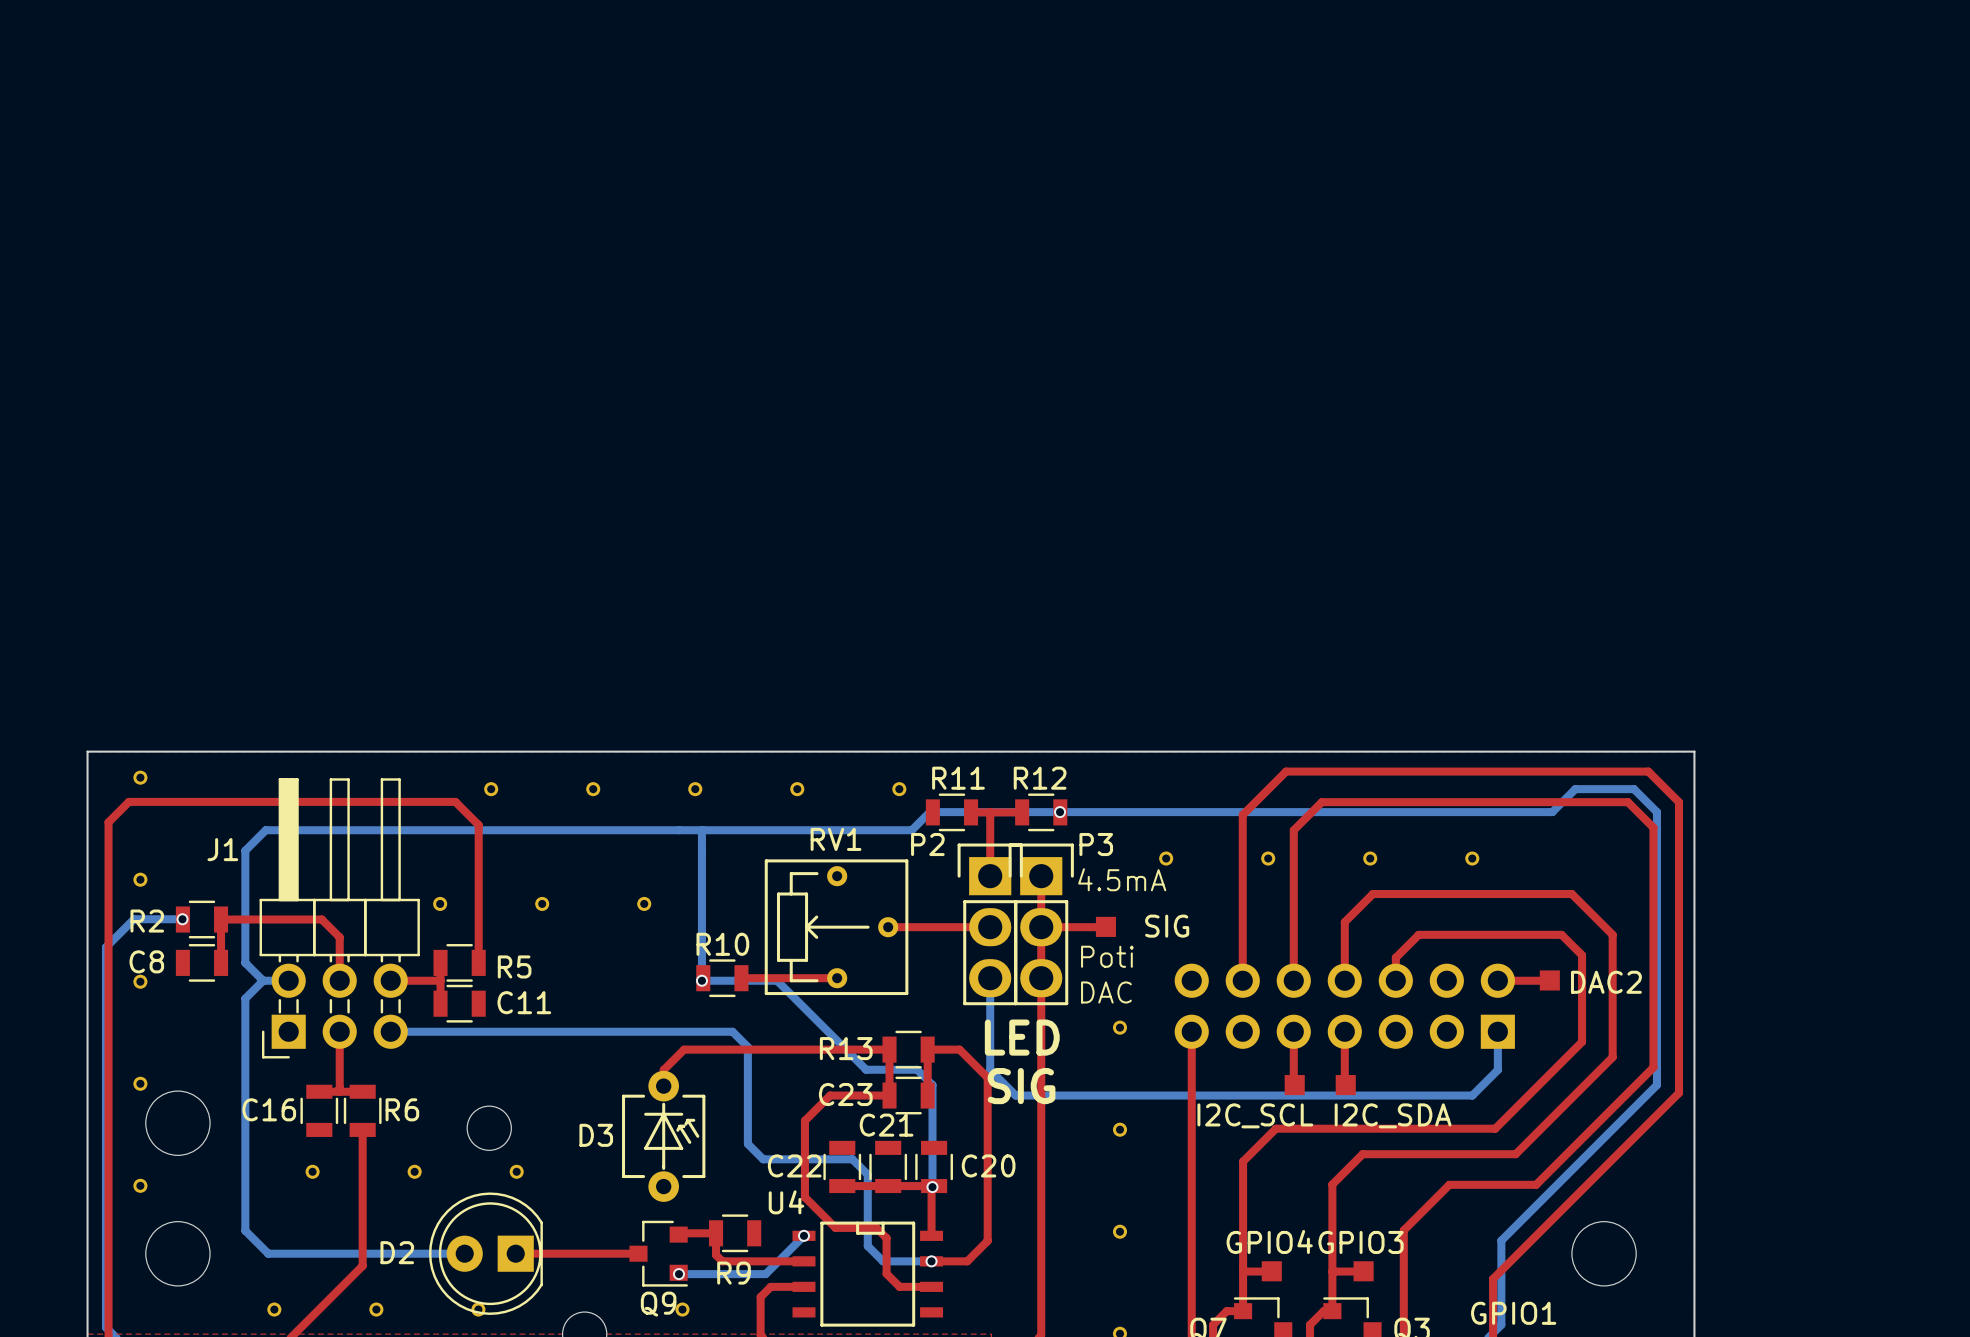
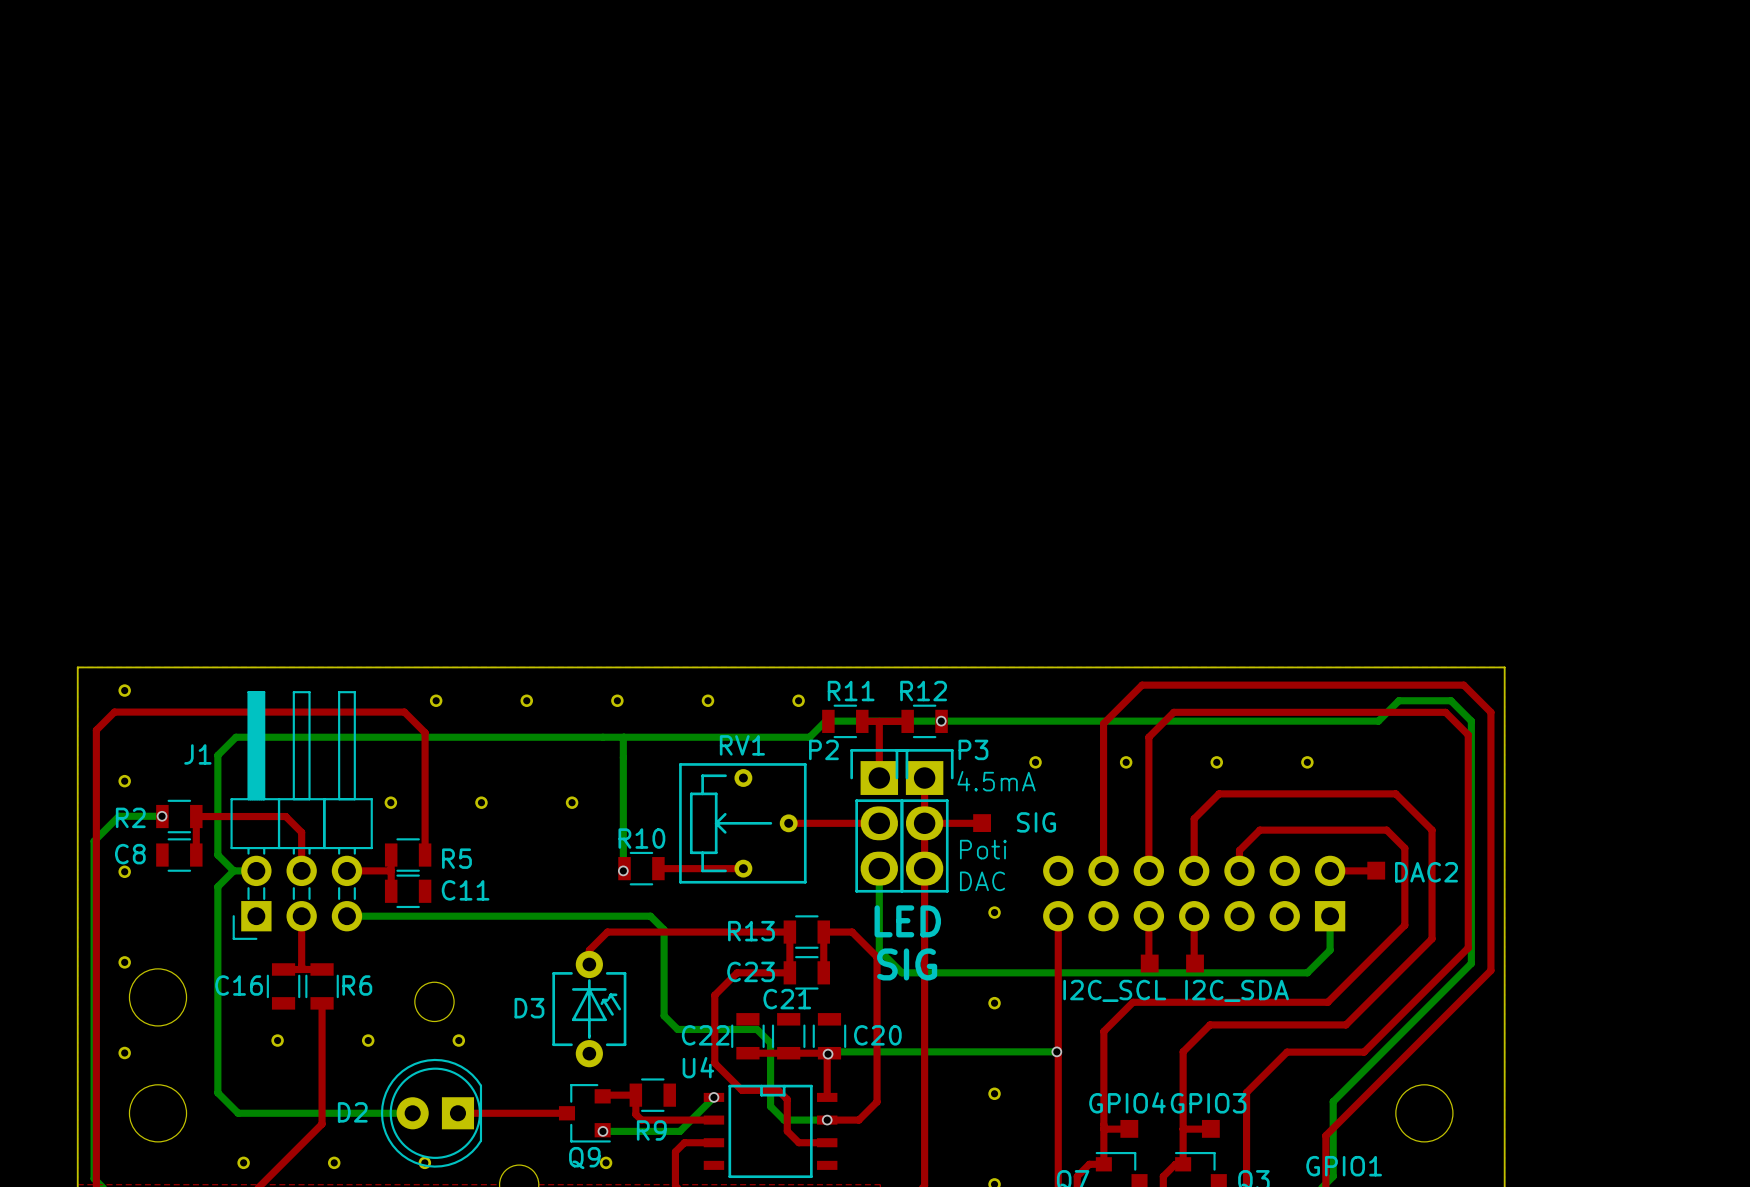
bottom track: (701, 980) (777, 980) (866, 1069) (917, 1069) (932, 1085) (932, 1187) -> none
bottom track: none -> (1056, 1051) (829, 1053)
via: none -> (1056, 1051)

